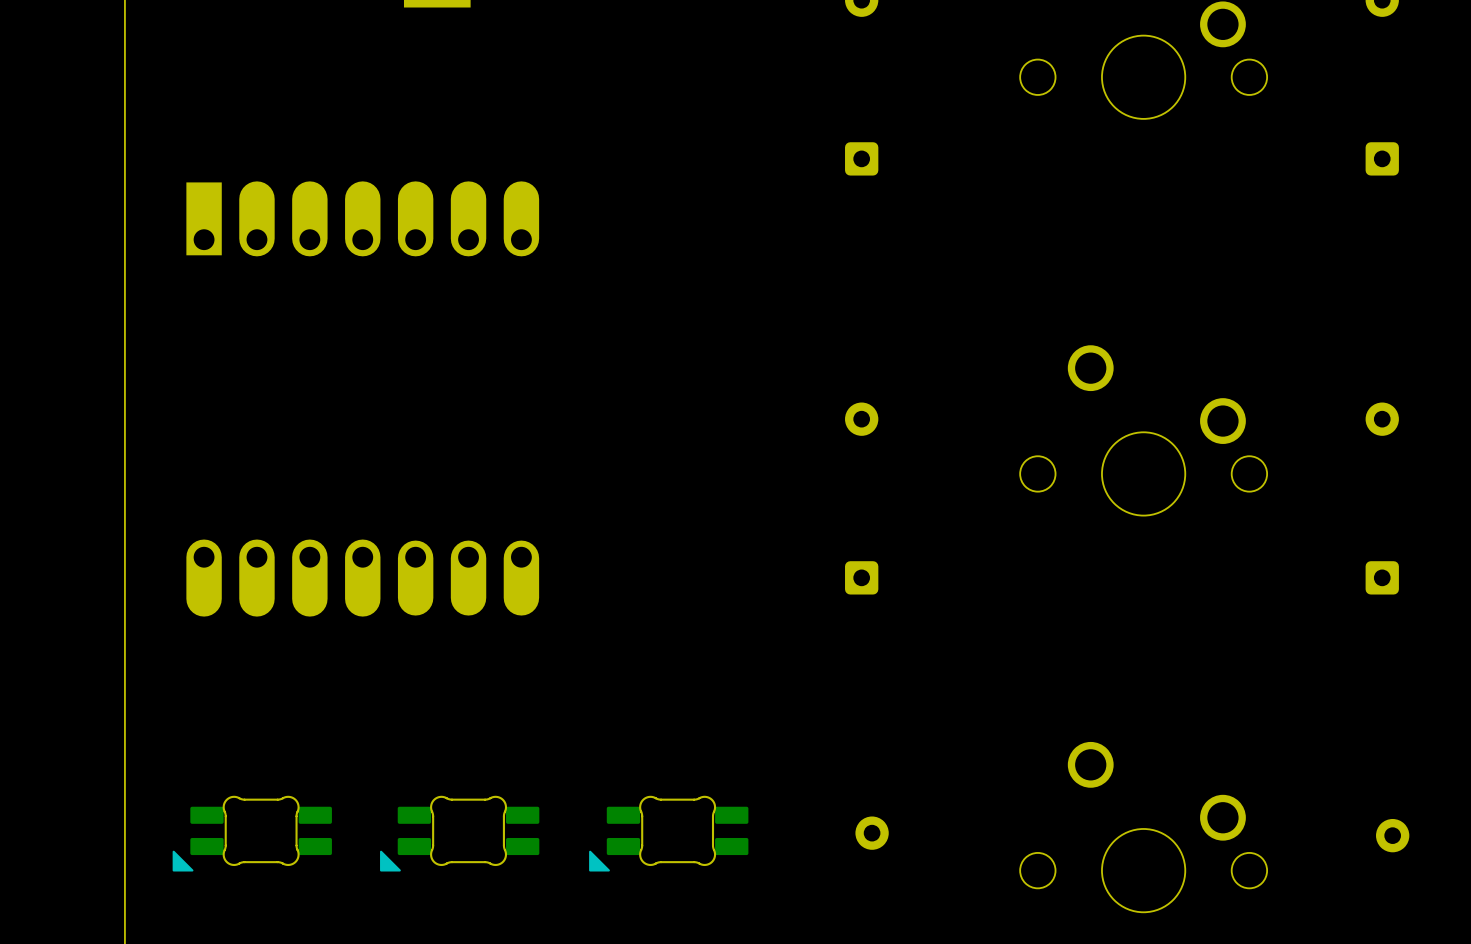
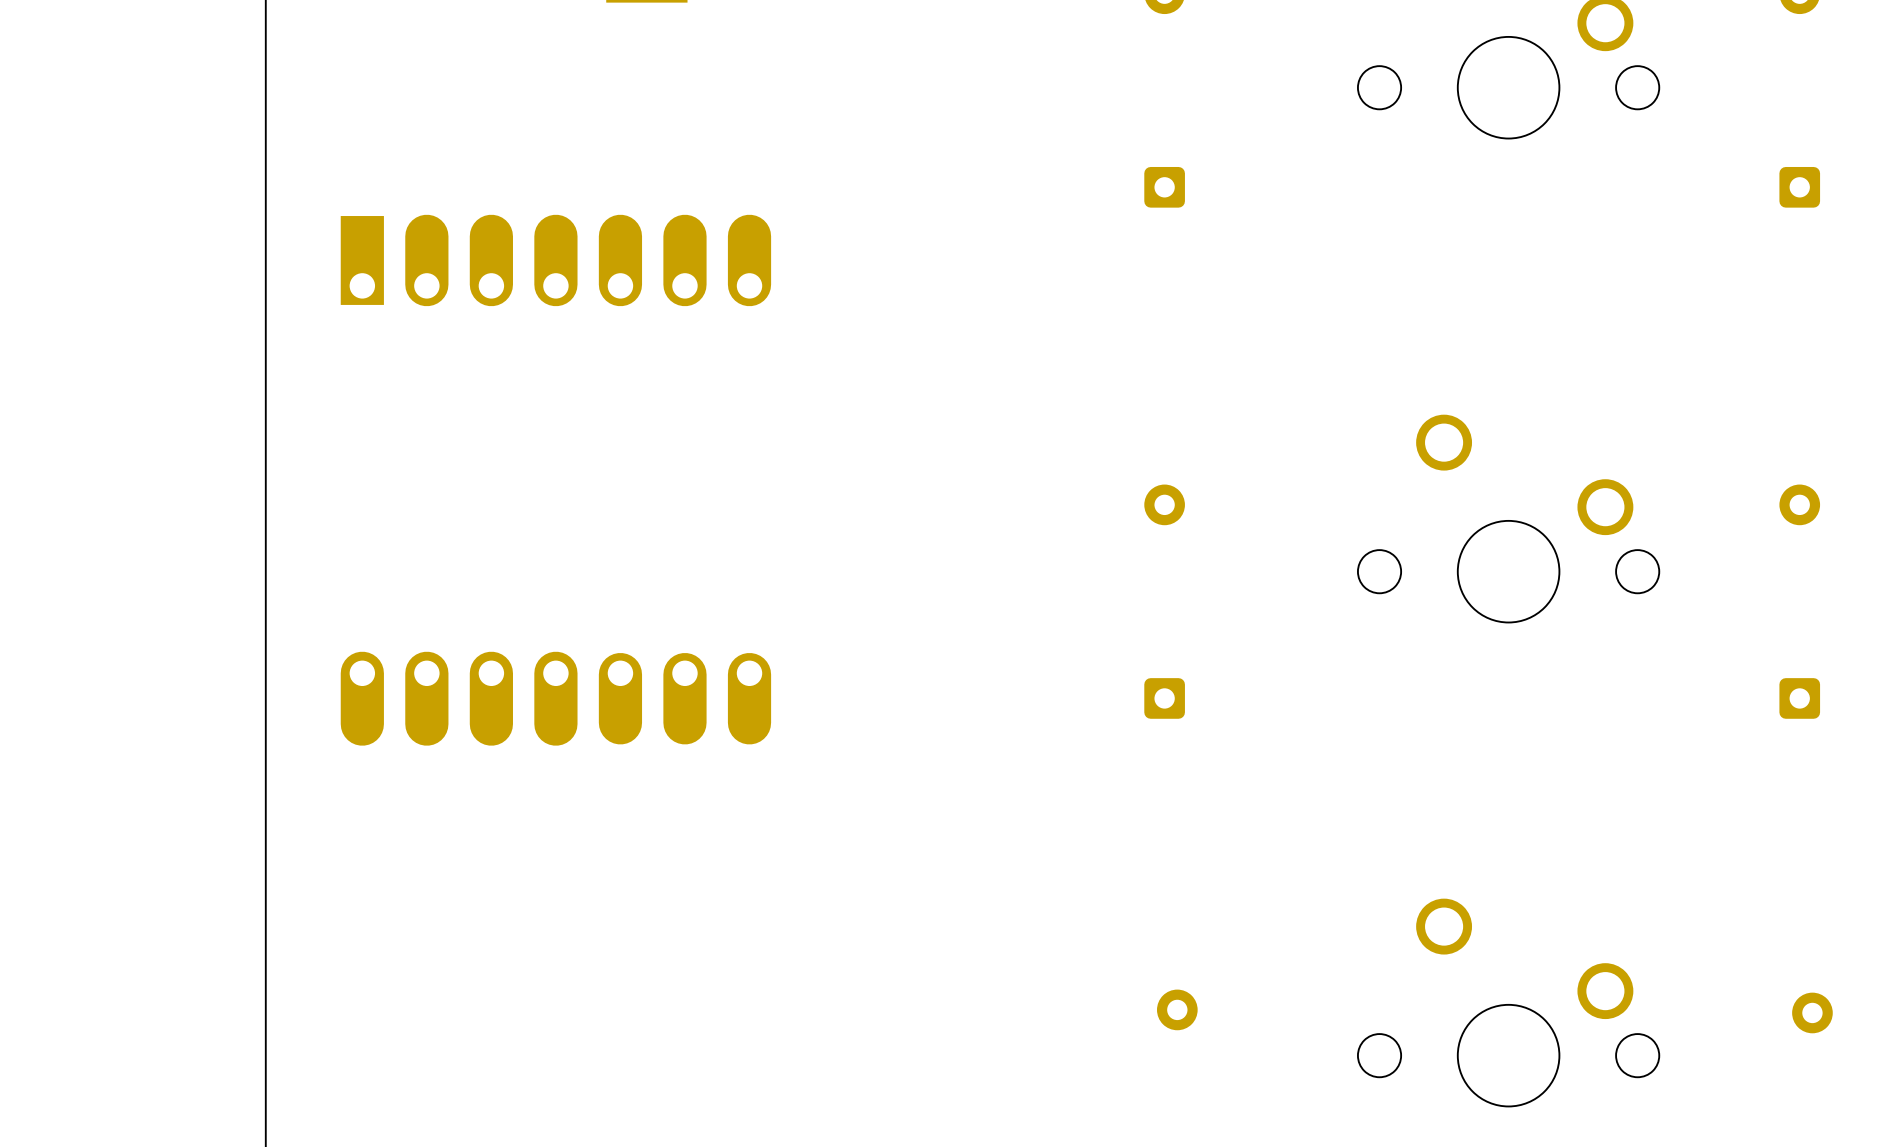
part: (252, 833) -> none
part: (459, 833) -> none
part: (668, 833) -> none

